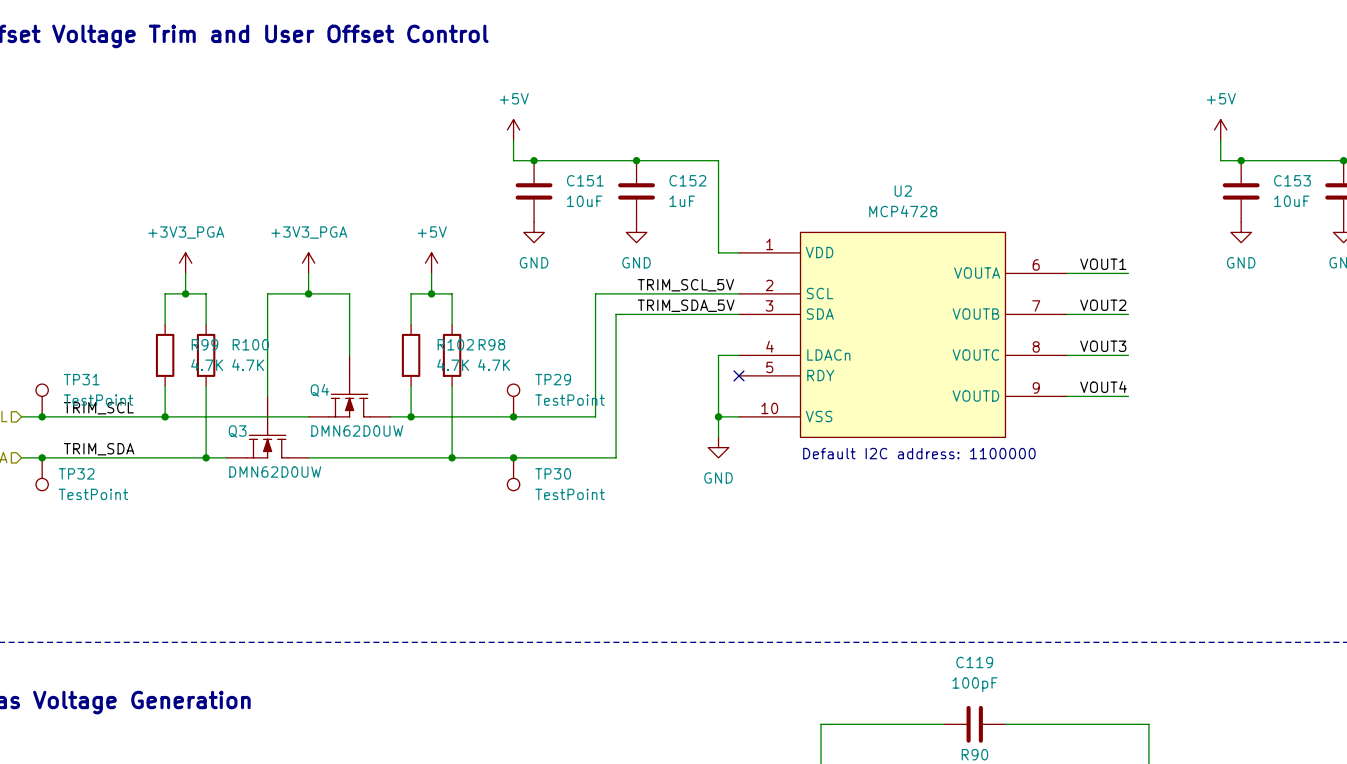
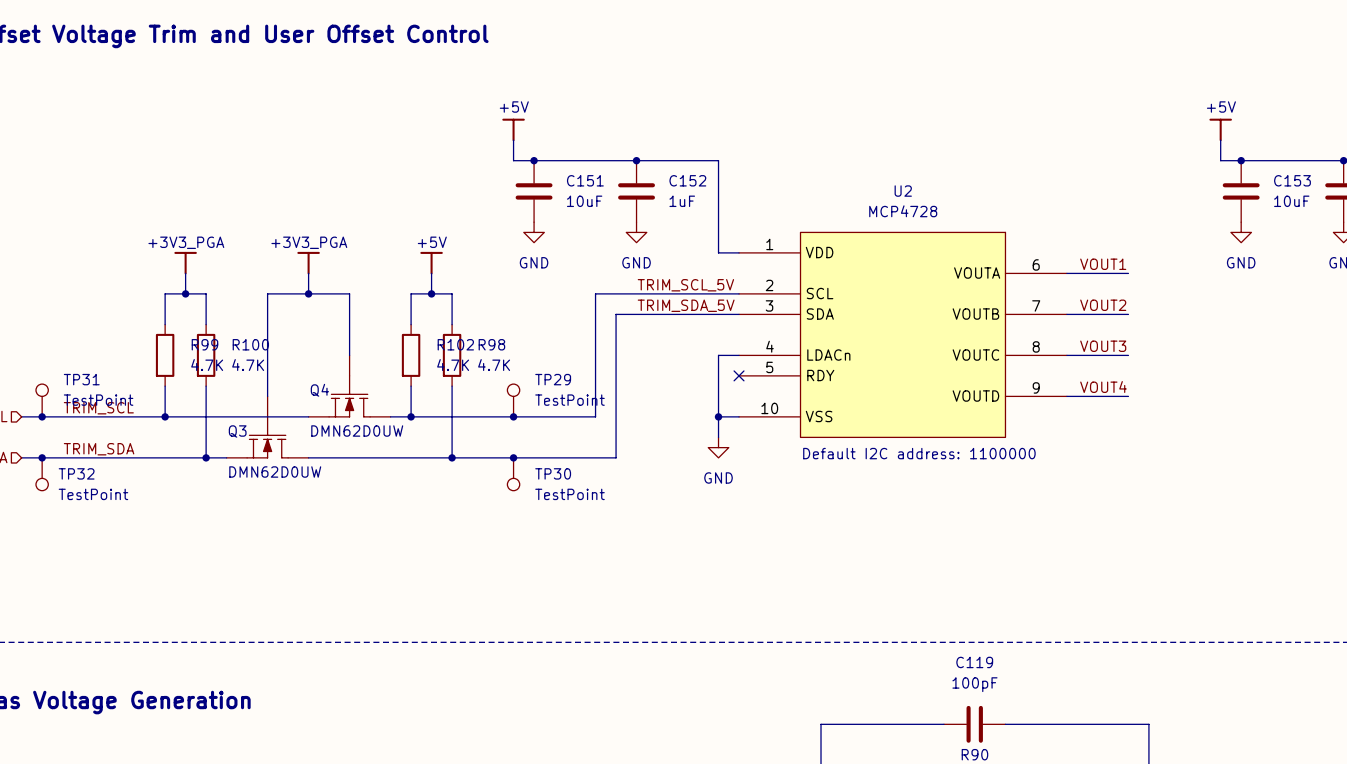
power symbol shape: [507, 119, 520, 141] -> [502, 118, 525, 142]
power symbol shape: [1214, 119, 1227, 141] -> [1209, 118, 1232, 142]
power symbol shape: [179, 252, 192, 274] -> [174, 251, 197, 275]
power symbol shape: [302, 252, 315, 274] -> [297, 251, 320, 275]
power symbol shape: [425, 252, 438, 274] -> [420, 251, 443, 275]

